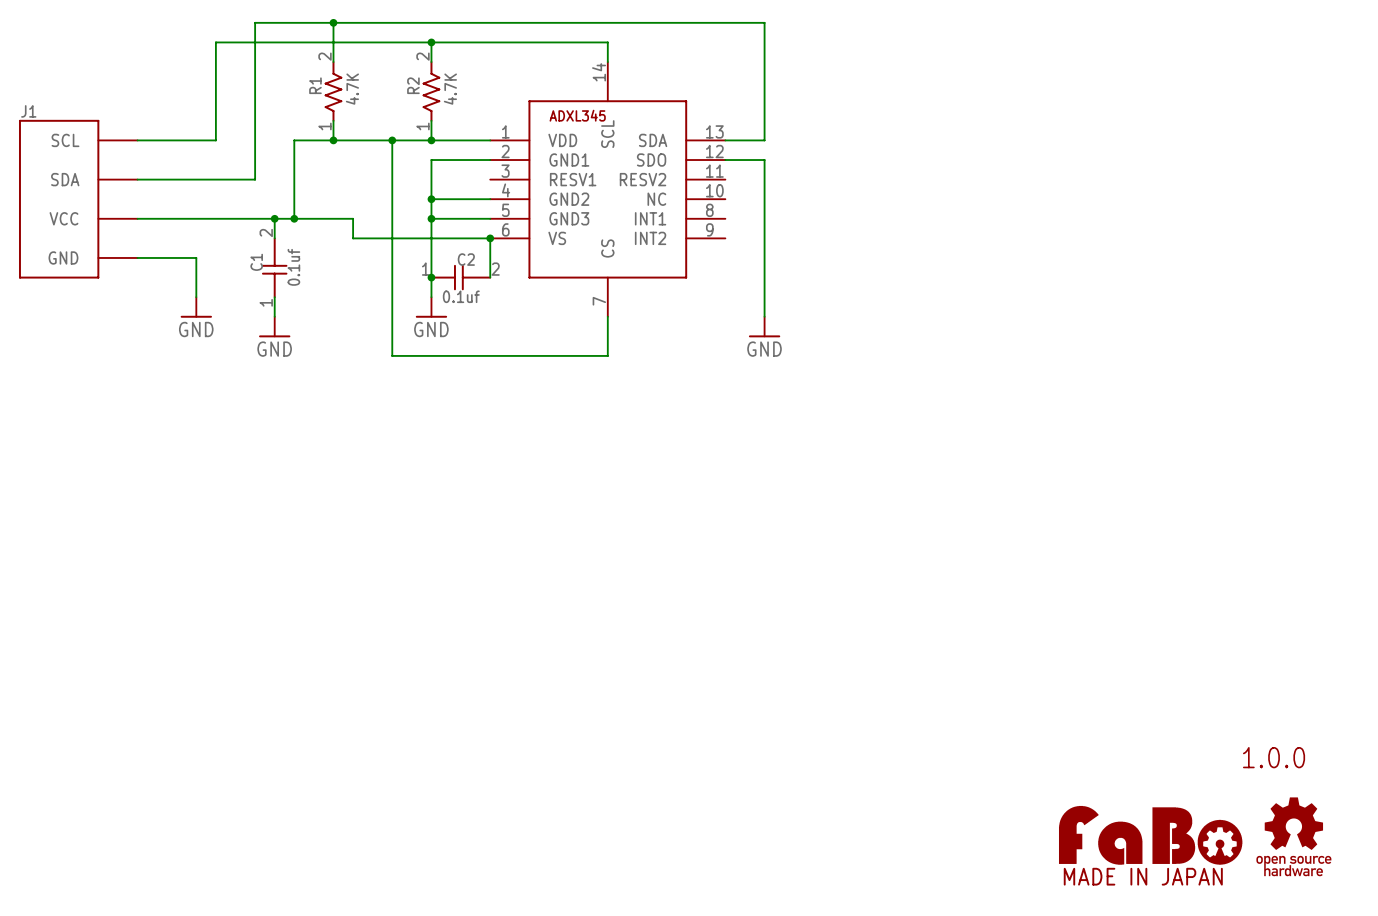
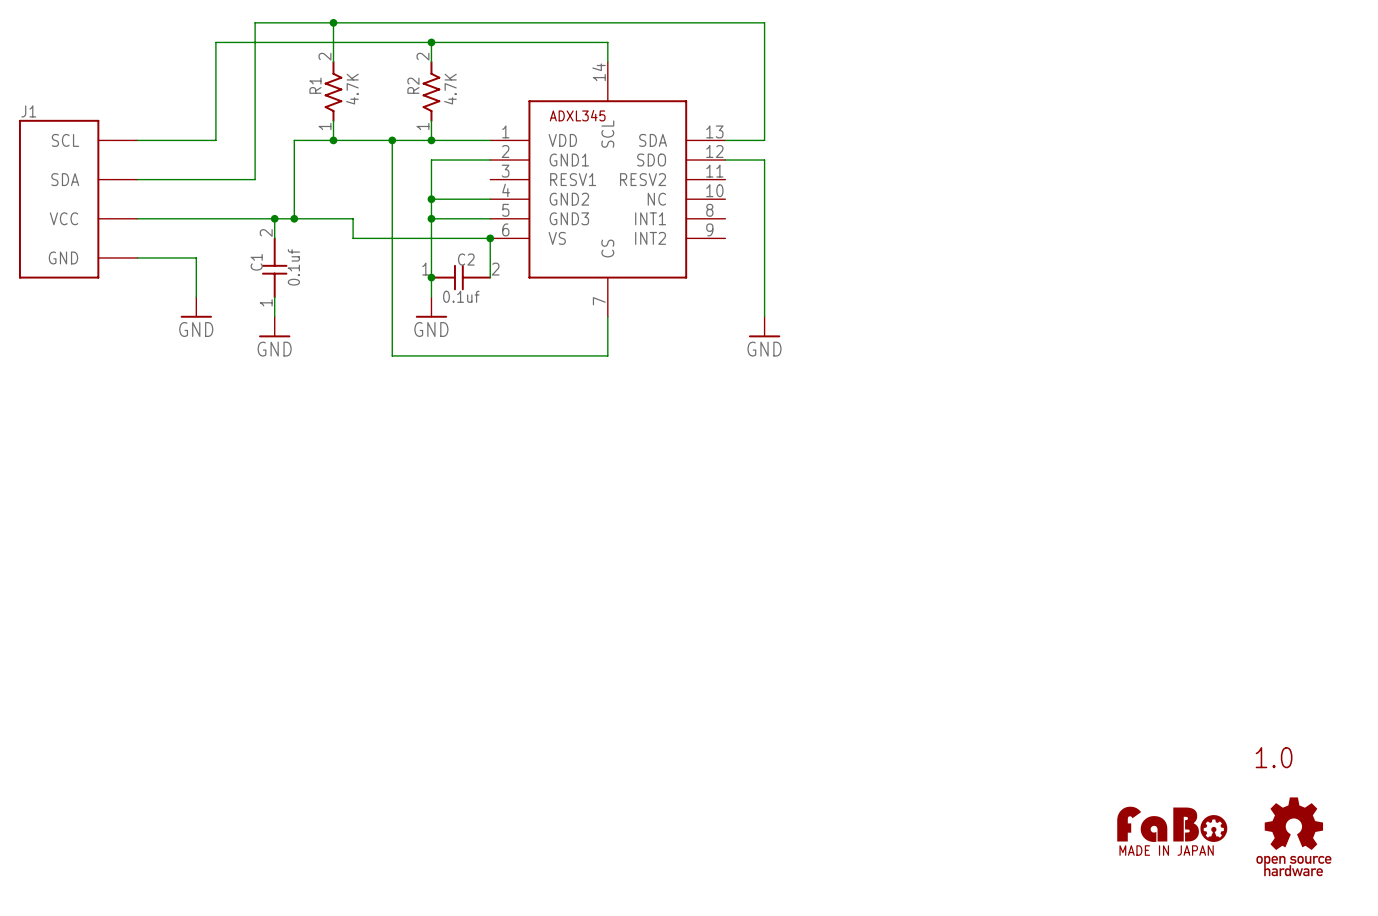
text: 1.0.0 (1274, 757) -> 1.0 (1274, 757)
part: none -> (1172, 824)
part: (1150, 835) -> none

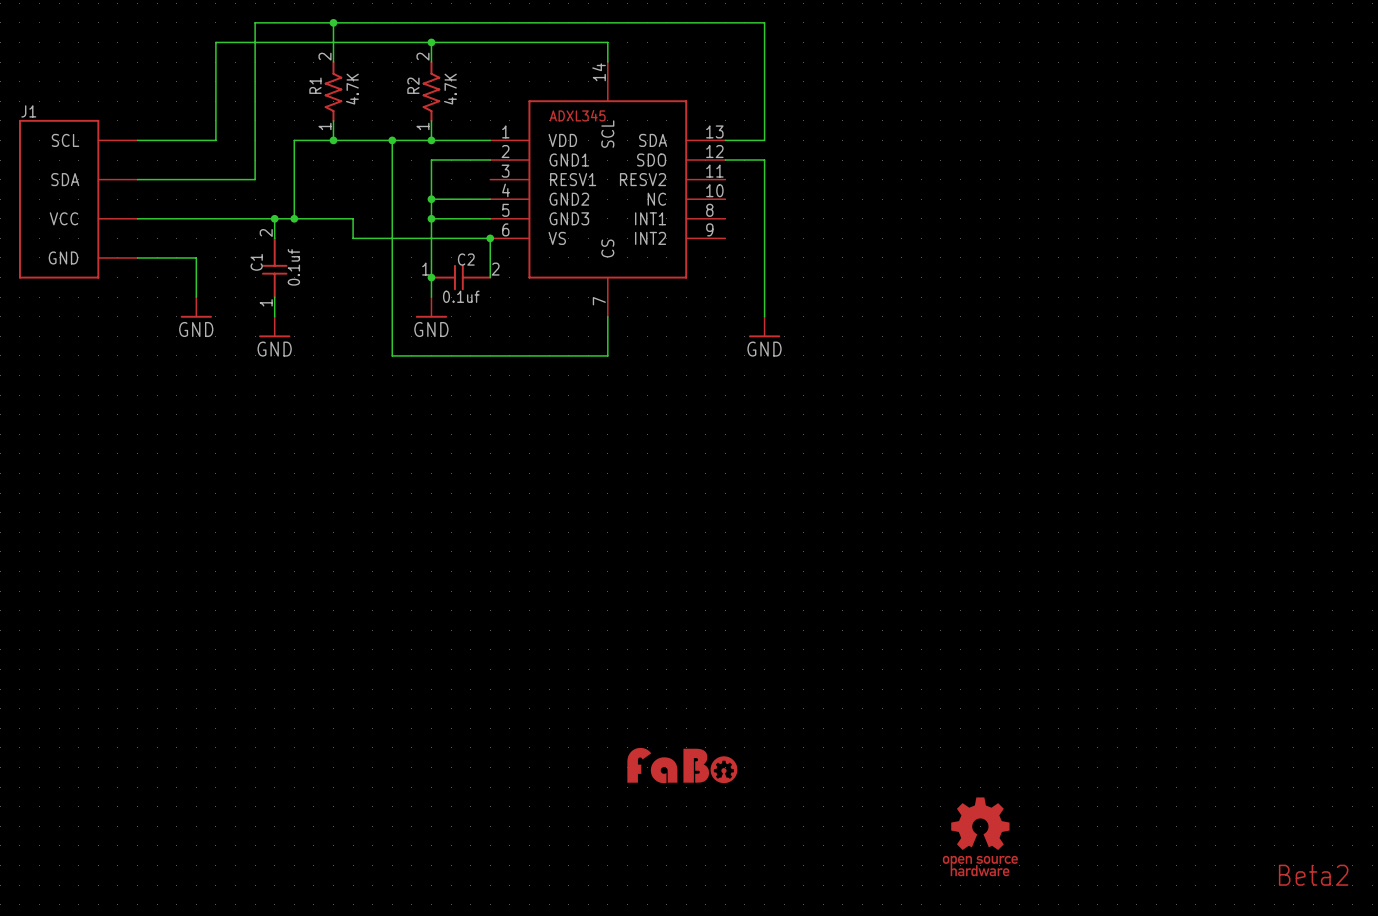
text: 1.0 (1274, 757) -> none
part: none -> (682, 765)
part: (1172, 824) -> none
part: none -> (980, 836)
part: (1293, 836) -> none
text: none -> Beta2 (1313, 875)

